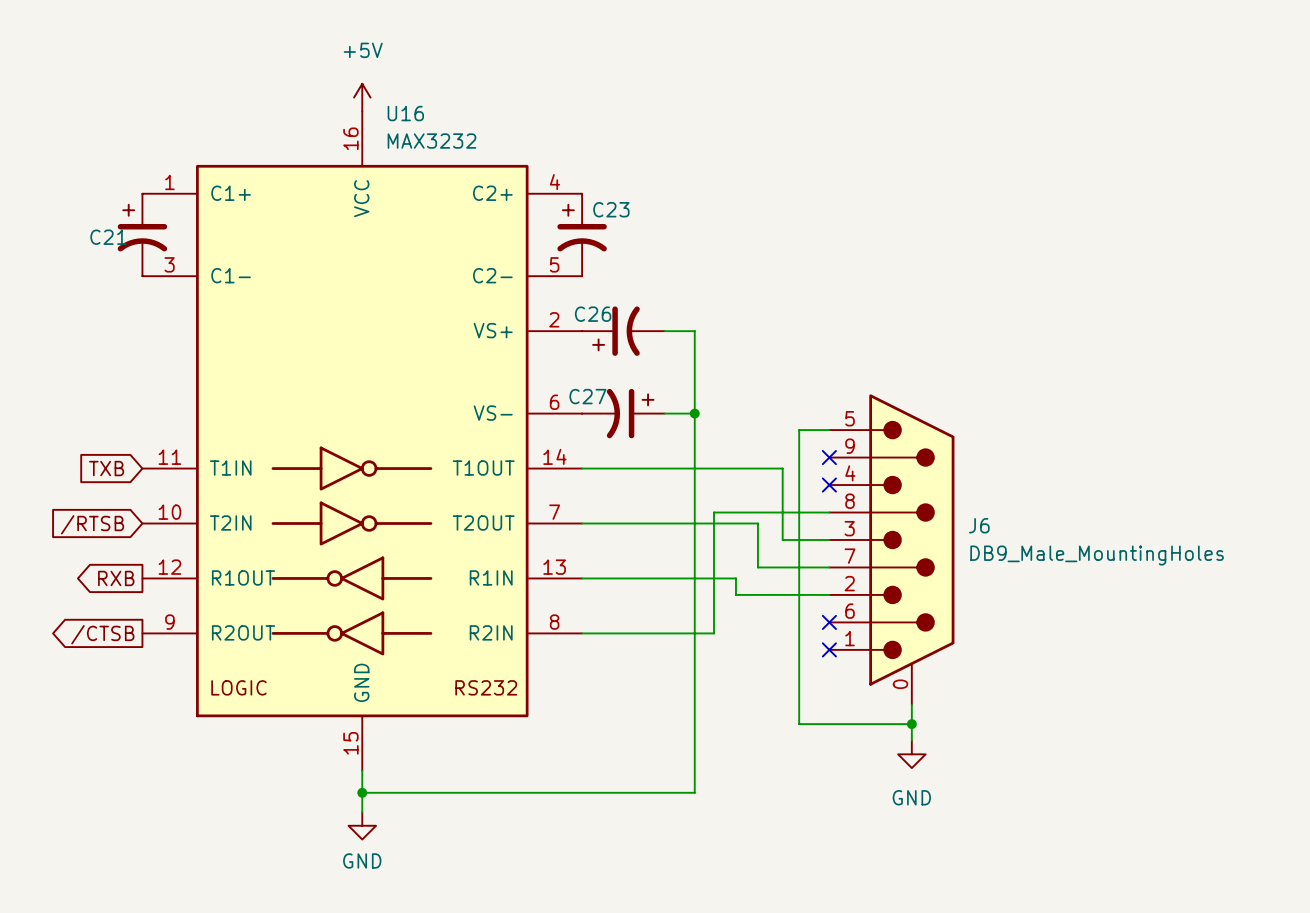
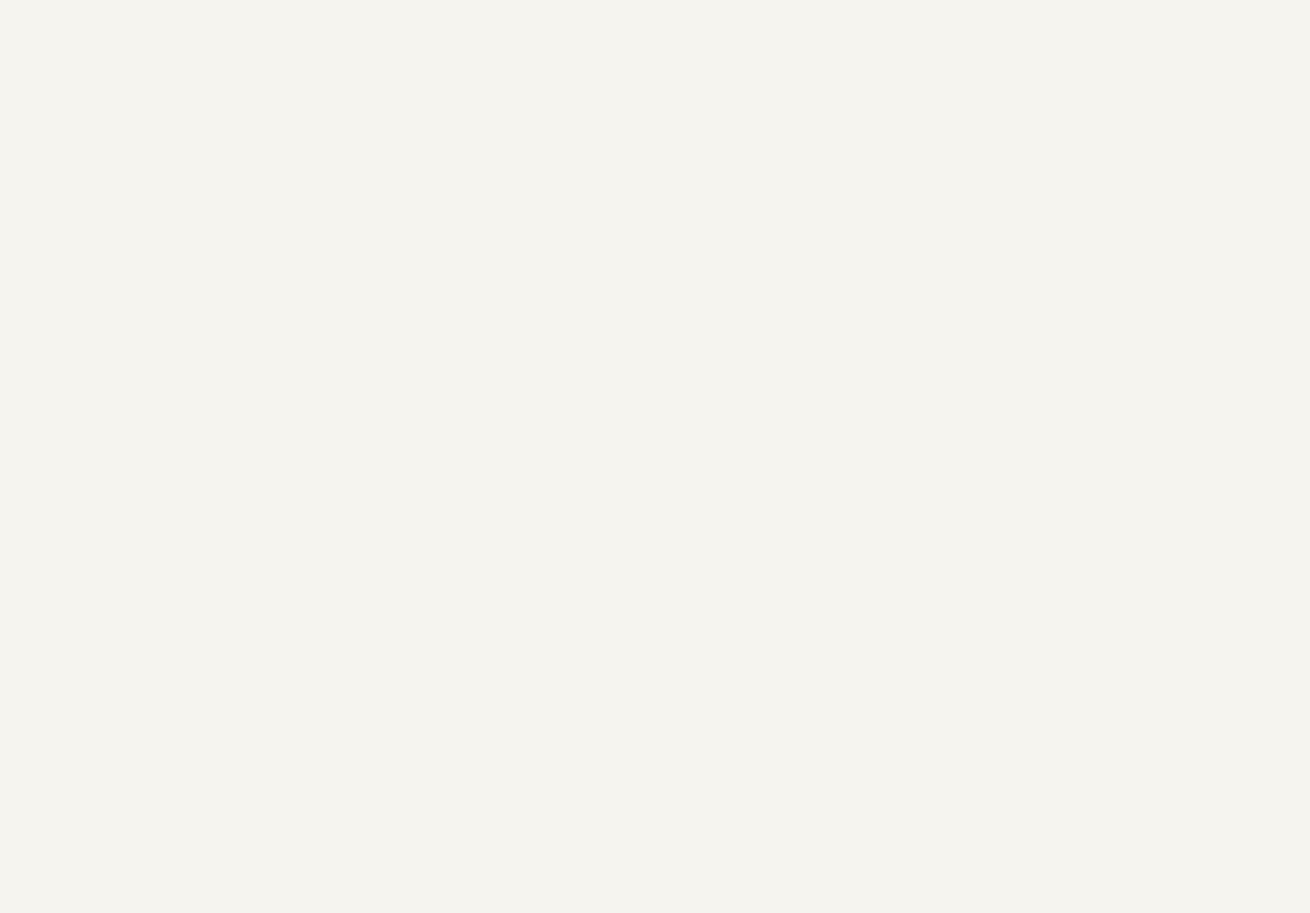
power symbol: +5V (362, 97) -> none
C21: (142, 234) -> none
C23: (582, 234) -> none
C26: (623, 331) -> none
wire: (664, 331) (694, 331) (694, 792) (362, 792) -> none
C27: (623, 413) -> none
wire: (664, 413) (694, 413) -> none
junction: (694, 413) -> none
wire: (829, 430) (799, 430) (799, 724) (911, 724) -> none
U16: MAX3232 (362, 441) -> none
no-connect mark: (829, 457) -> none
global label: TXB (106, 468) -> none
wire: (582, 468) (782, 468) (782, 539) (829, 539) -> none
no-connect mark: (829, 485) -> none
wire: (829, 512) (714, 512) (714, 633) (582, 633) -> none
wire: (582, 523) (757, 523) (757, 567) (829, 567) -> none
global label: /RTSB (92, 524) -> none
J6: DB9_Male_MountingHoles (891, 549) -> none
global label: RXB (116, 578) -> none
wire: (582, 578) (735, 578) (735, 594) (829, 594) -> none
no-connect mark: (829, 622) -> none
global label: /CTSB (102, 634) -> none
no-connect mark: (829, 649) -> none
wire: (911, 704) (911, 740) -> none
junction: (911, 724) -> none
power symbol: GND (911, 754) -> none
wire: (362, 770) (362, 812) -> none
junction: (362, 792) -> none
power symbol: GND (362, 825) -> none

